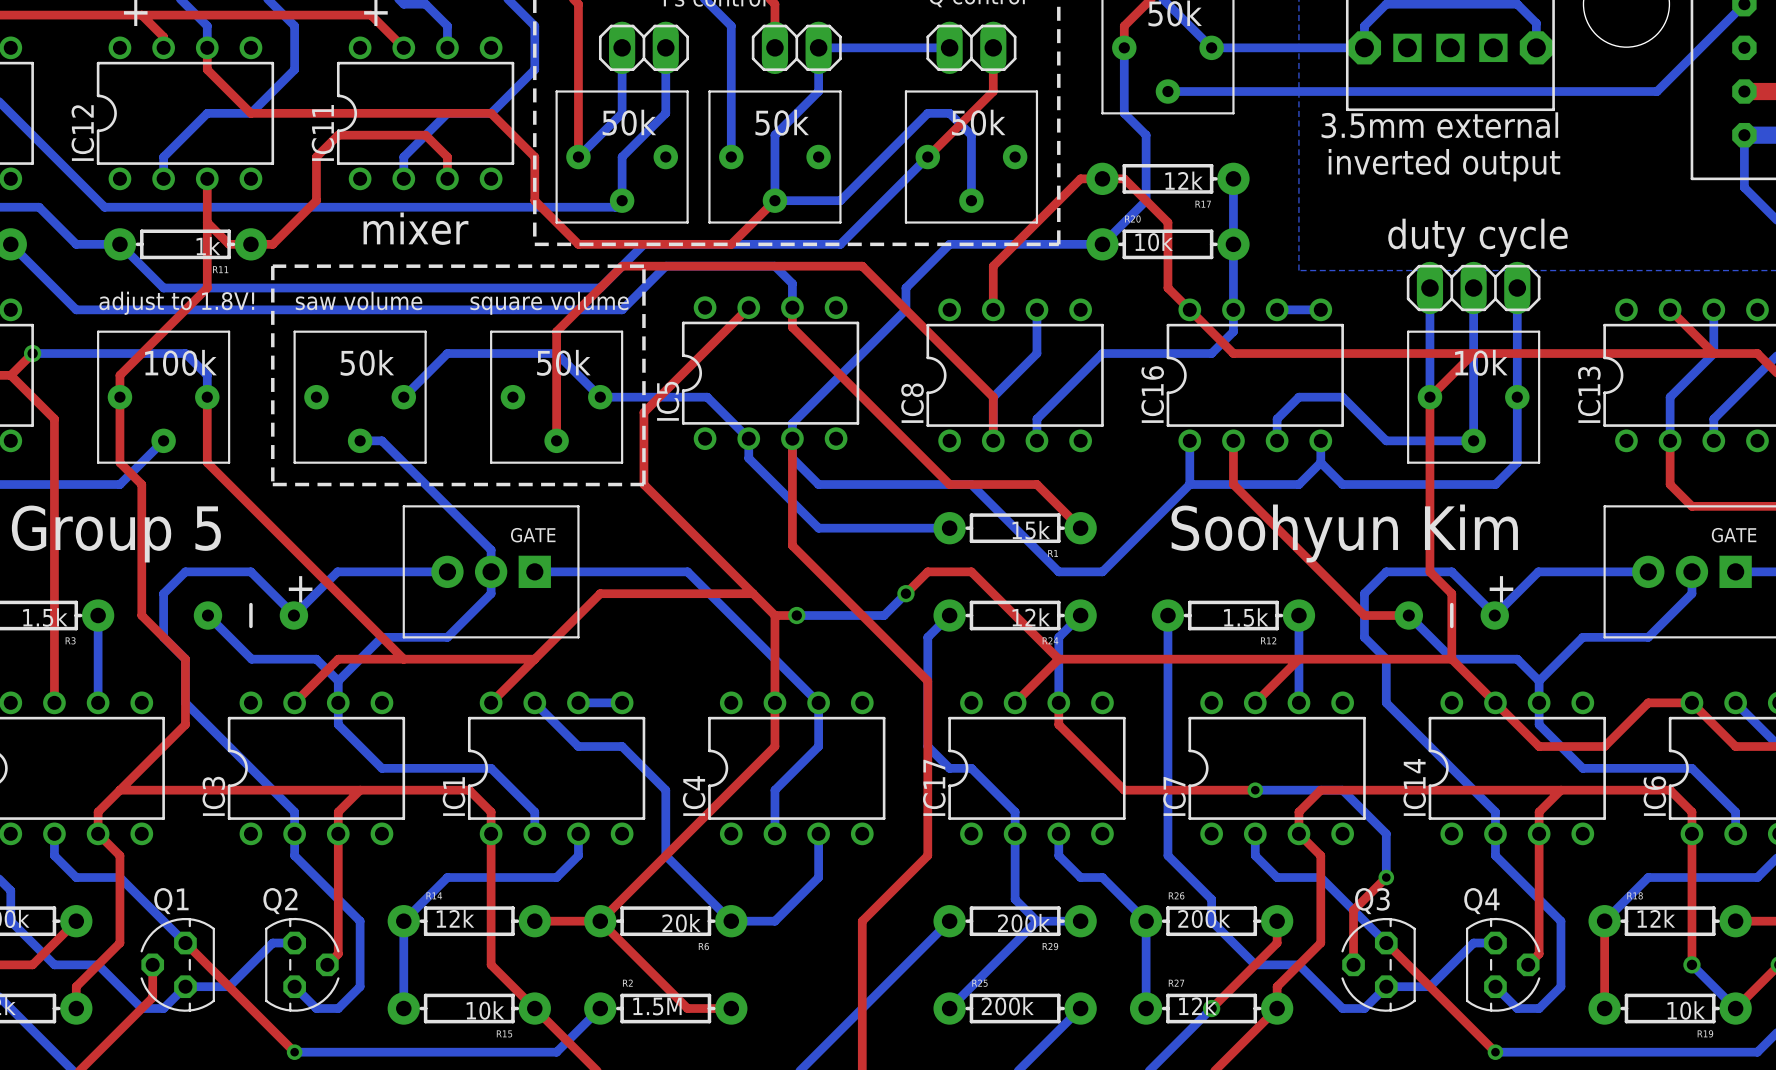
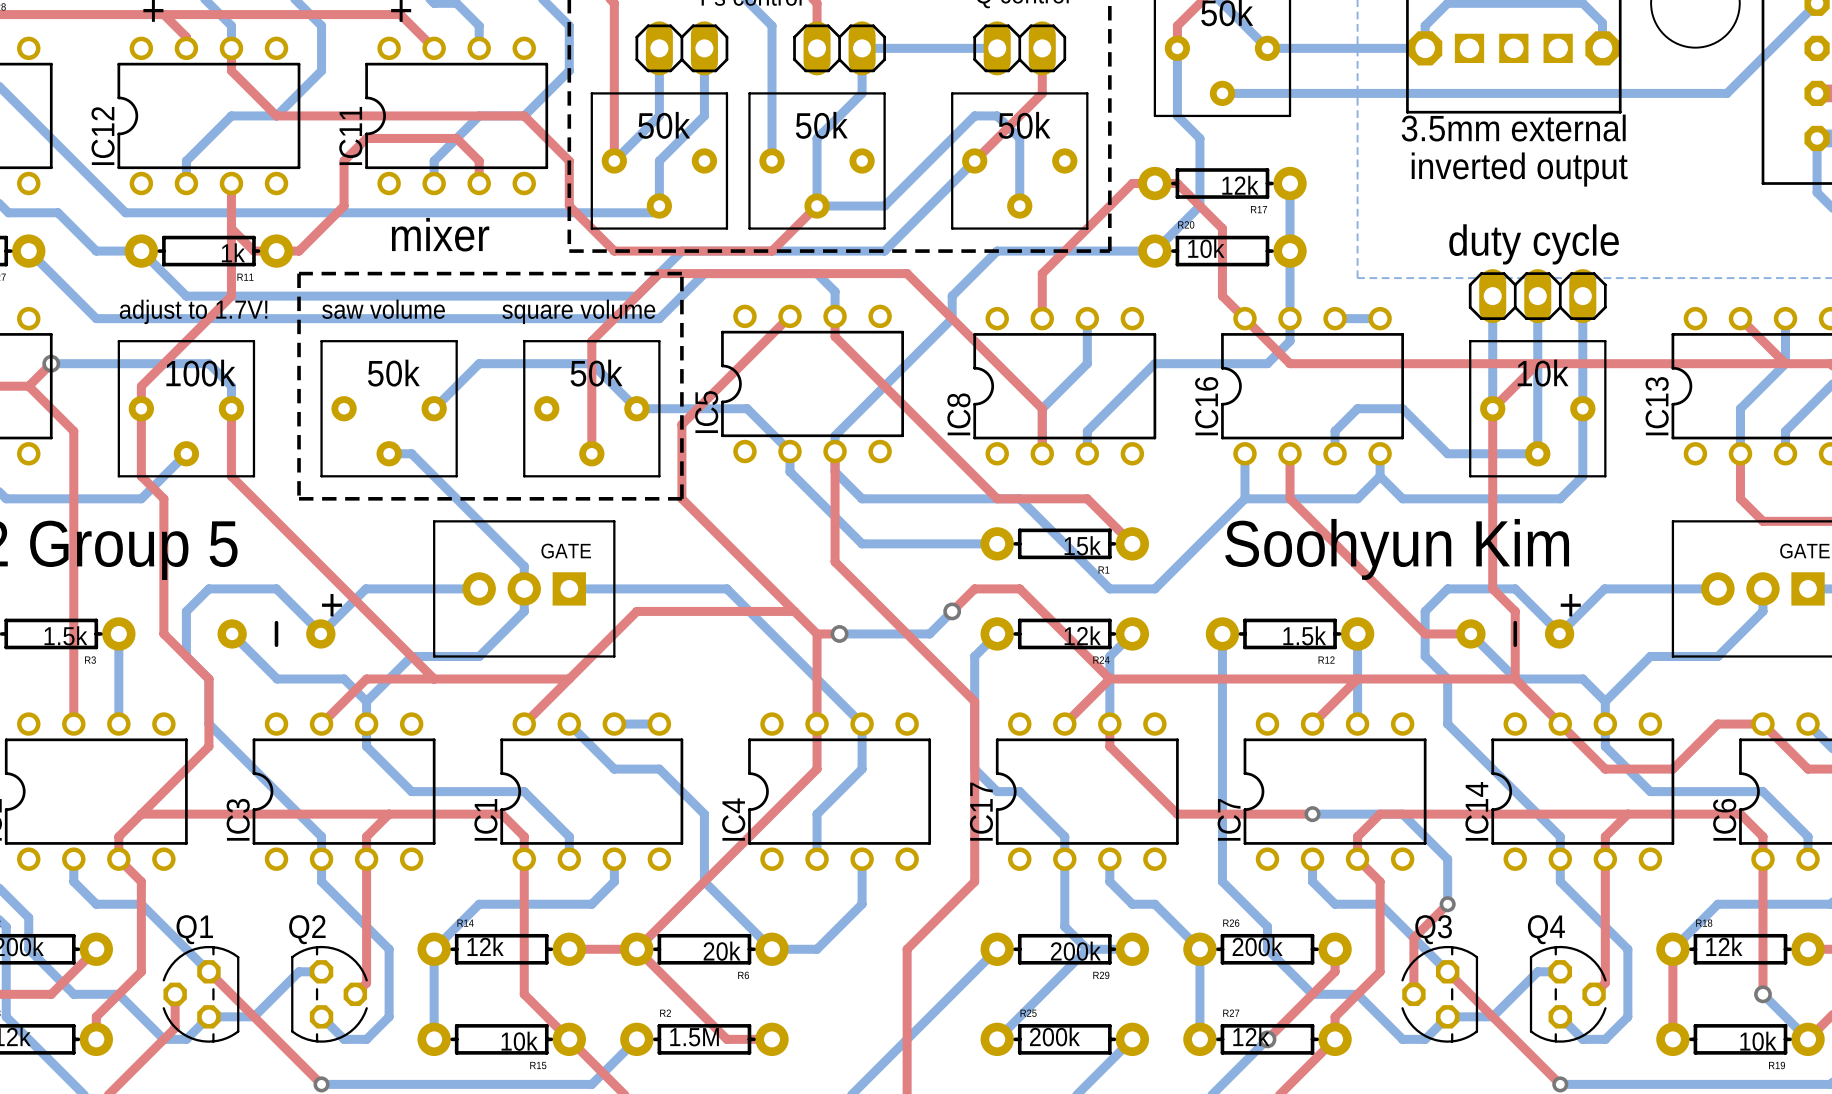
text: adjust to 1.8V! (176, 303) -> adjust to 1.7V! (193, 311)

